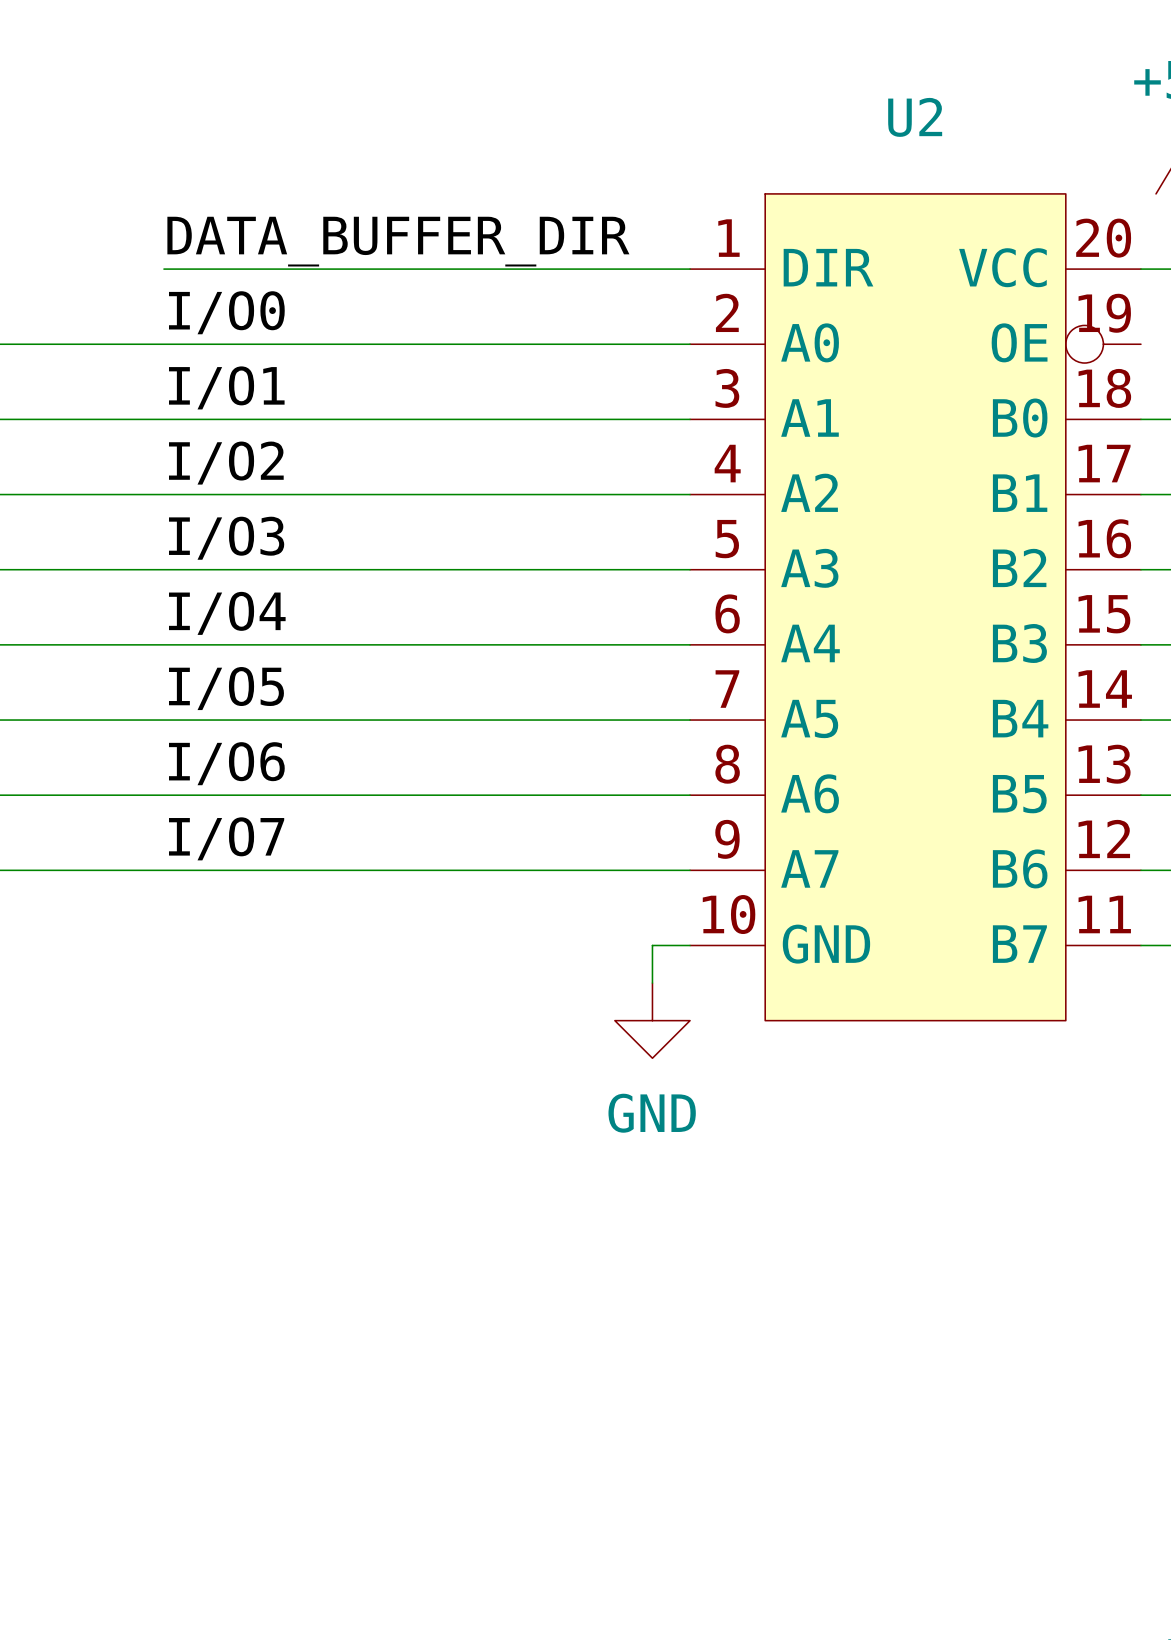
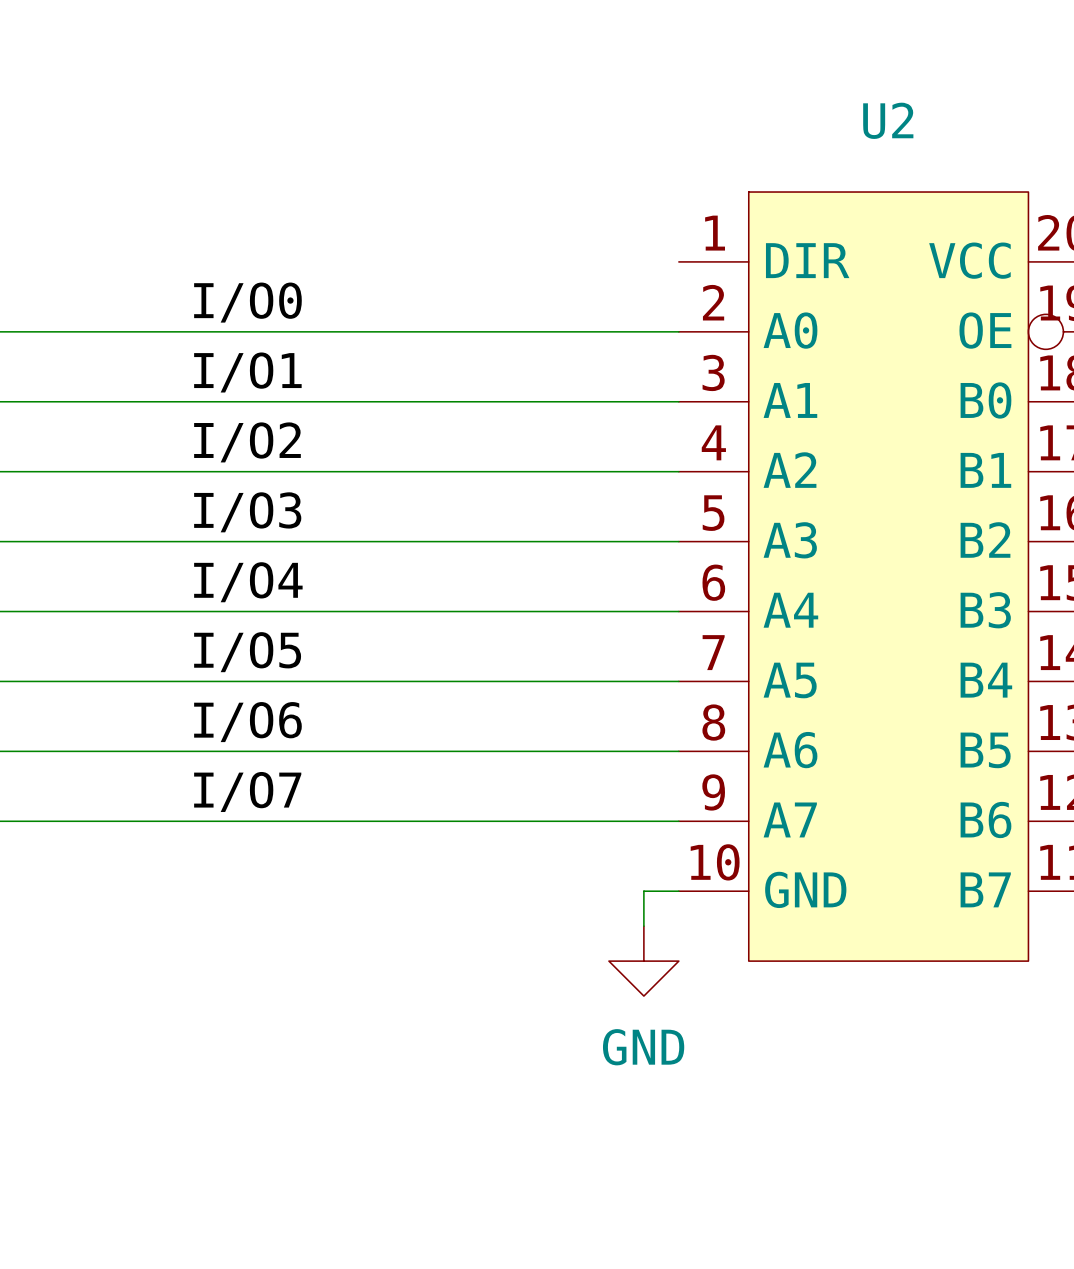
label: DATA_BUFFER_DIR (398, 241) -> none
wire: (163, 269) (690, 269) -> none

